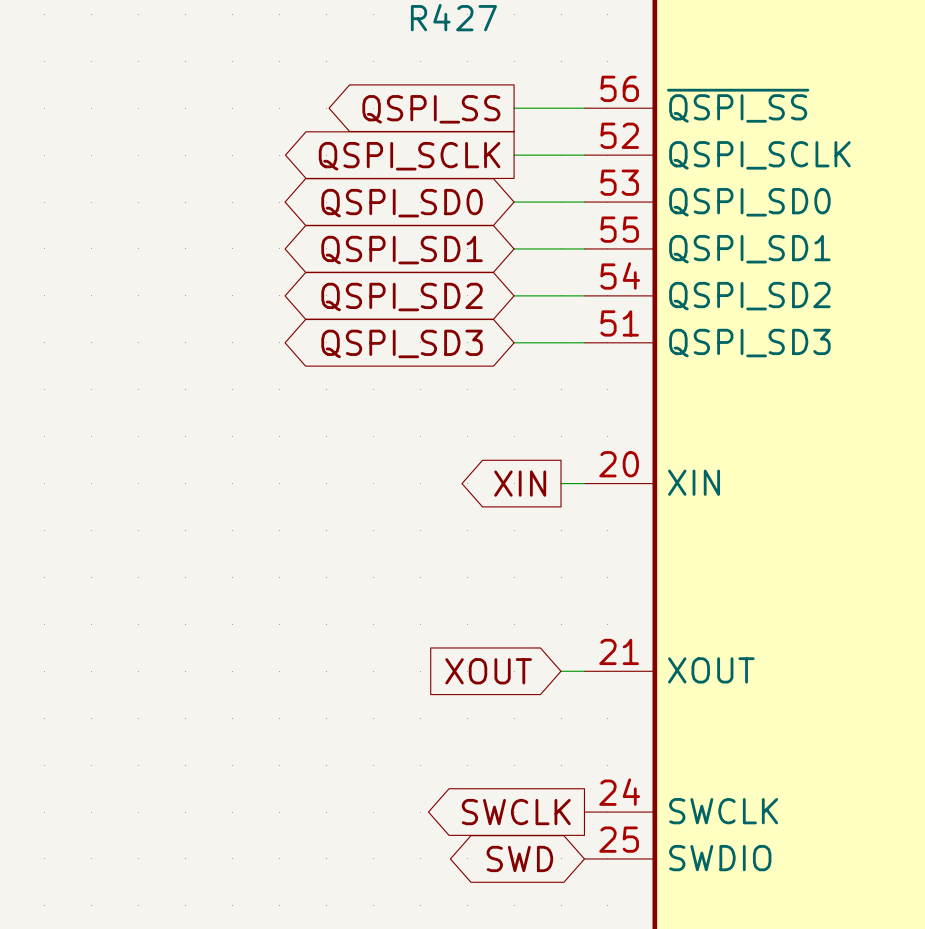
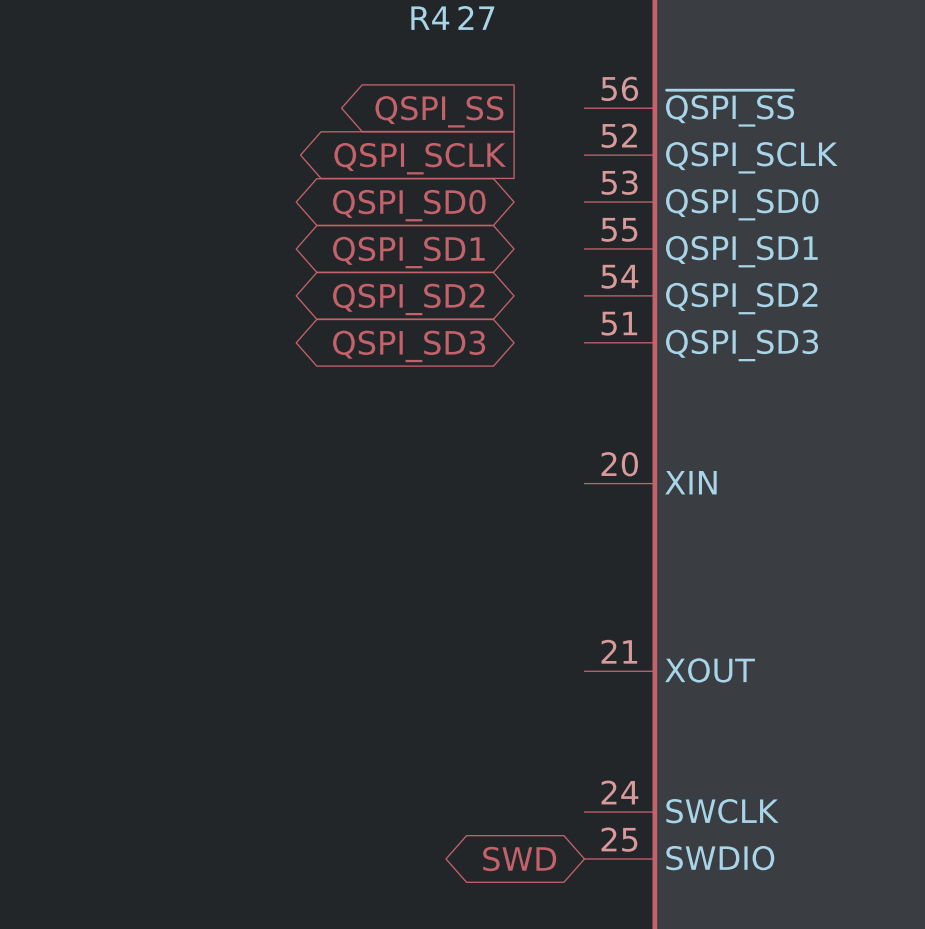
wire: (514, 108) (584, 108) -> none
wire: (514, 155) (584, 155) -> none
wire: (514, 202) (584, 202) -> none
wire: (514, 248) (584, 248) -> none
wire: (514, 295) (584, 295) -> none
wire: (514, 342) (584, 342) -> none
global label: XIN (520, 483) -> none
wire: (561, 483) (584, 483) -> none
global label: XOUT (488, 671) -> none
wire: (561, 671) (584, 671) -> none
global label: SWCLK (516, 812) -> none

